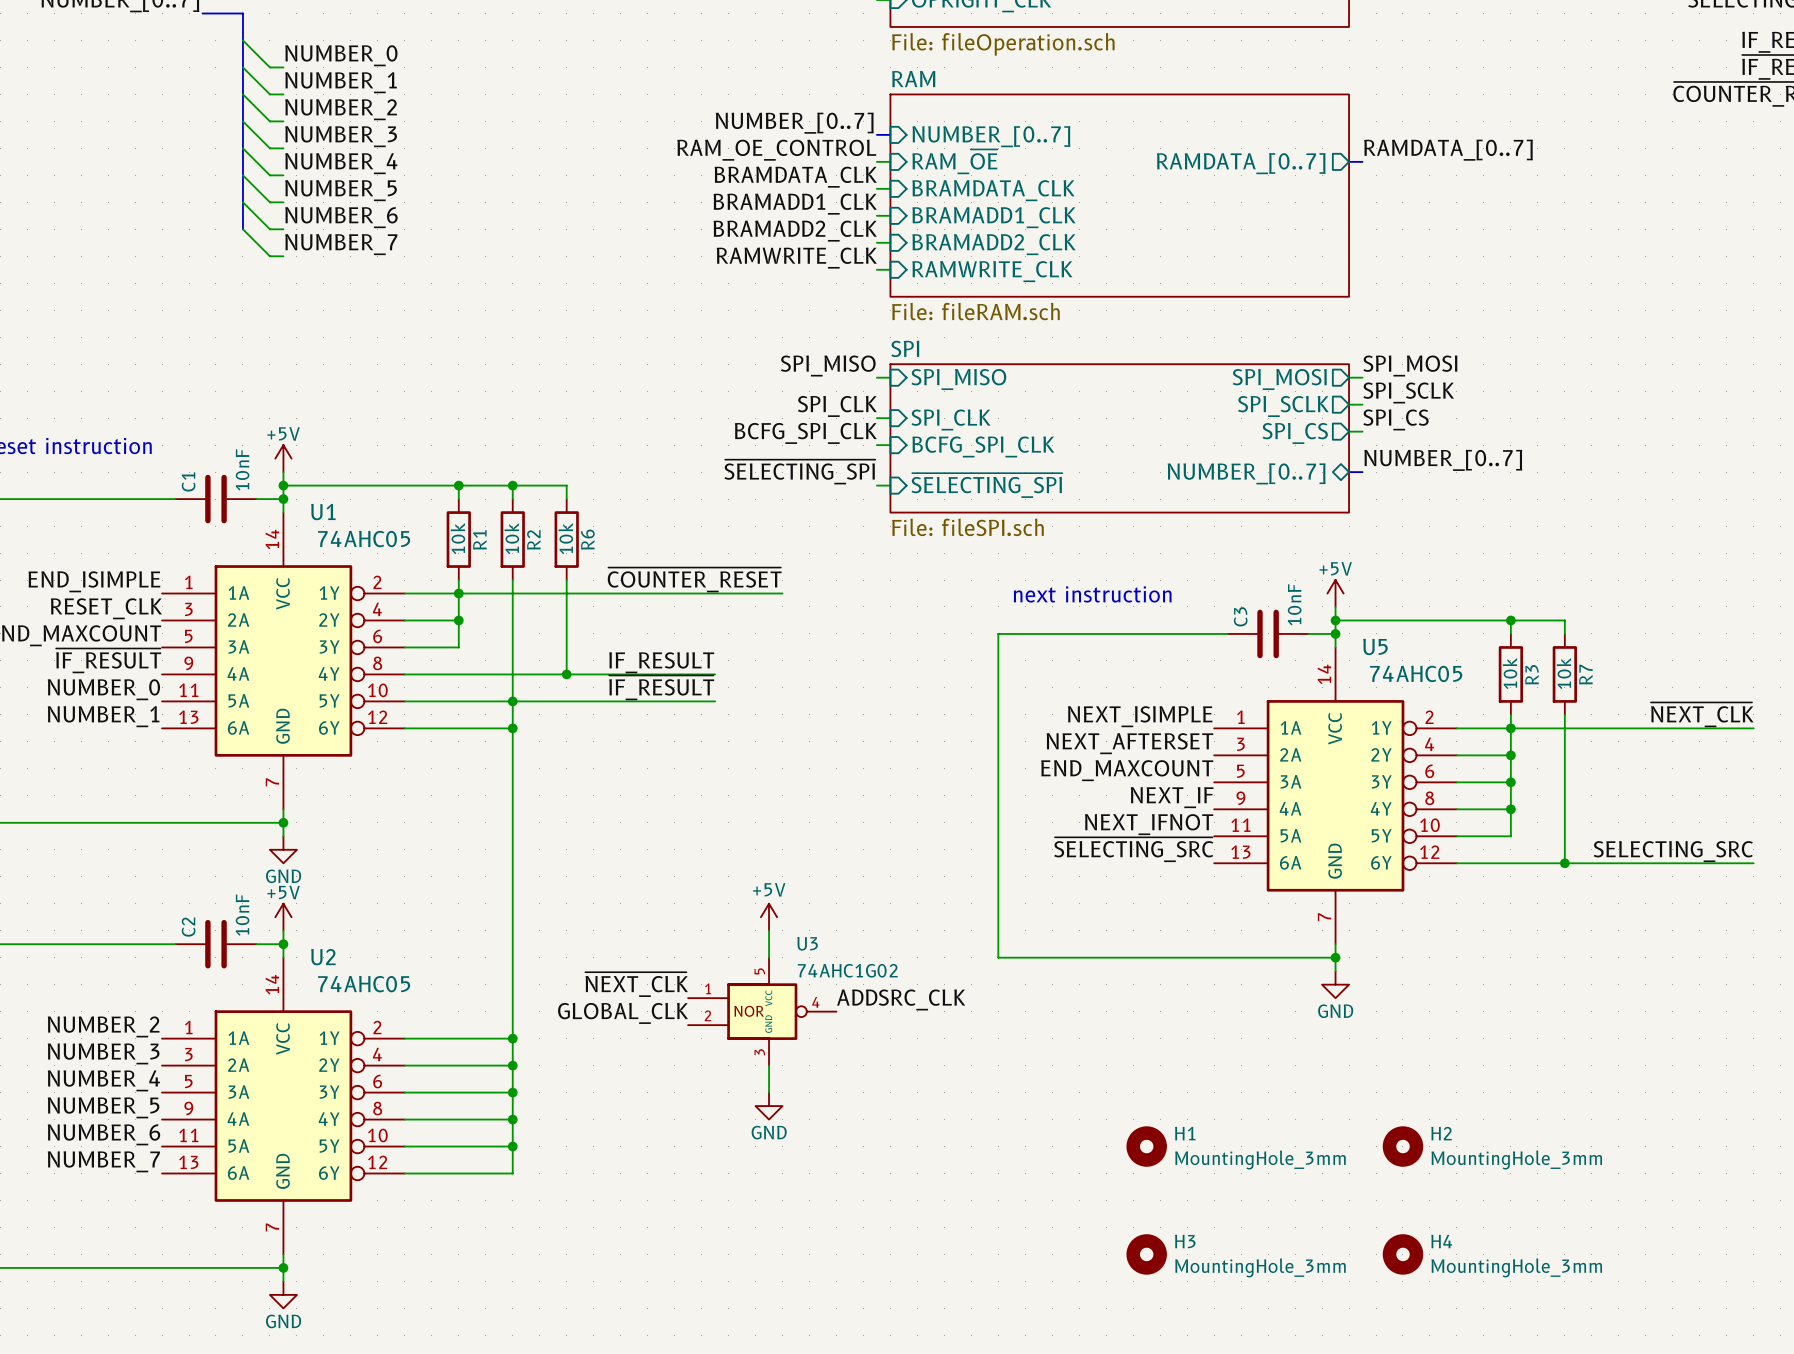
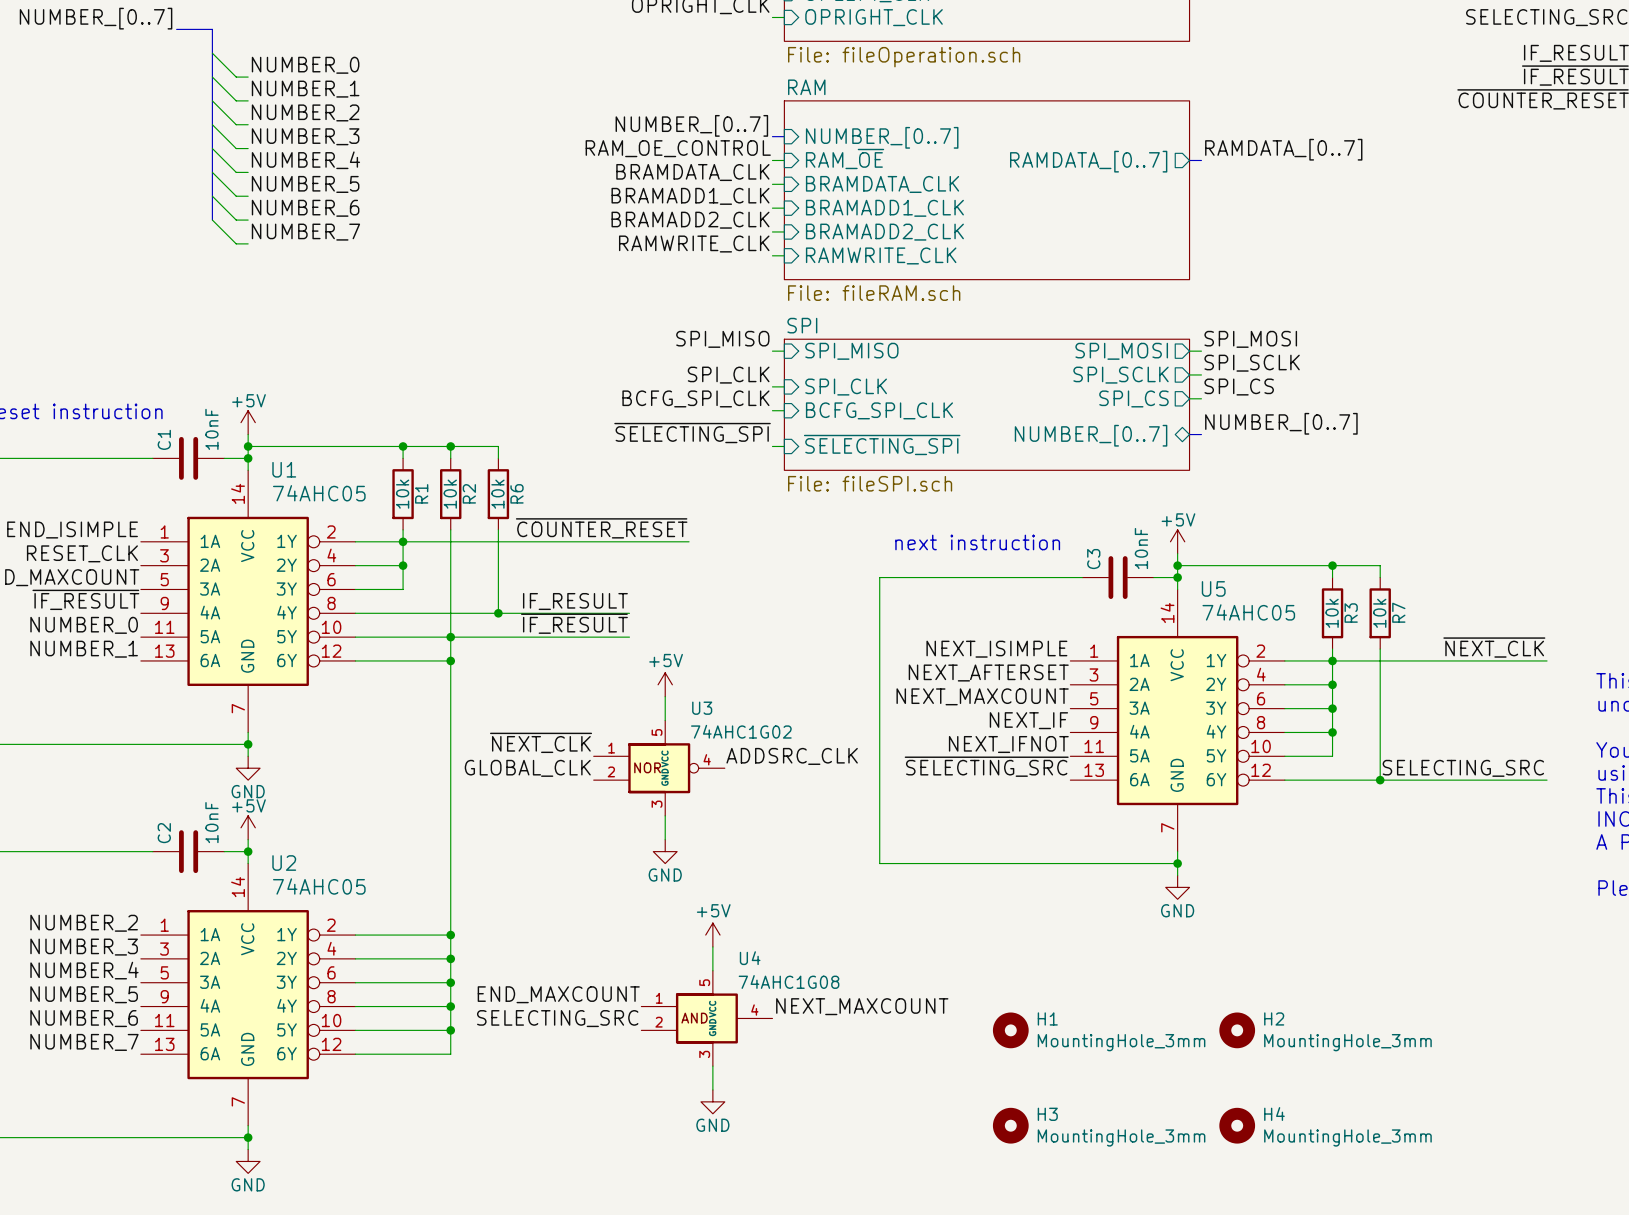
power symbol: none -> +5V (665, 684)
wire: none -> (665, 696) (665, 720)
label: END_MAXCOUNT (1127, 770) -> NEXT_MAXCOUNT (982, 696)
wire: none -> (665, 815) (665, 839)
power symbol: +5V (769, 917) -> none
wire: (769, 930) (769, 957) -> (712, 946) (712, 970)
power symbol: none -> GND (665, 851)
label position: ~{NEXT_CLK} (636, 984) -> ~{NEXT_CLK} (541, 742)
label position: ADDSRC_CLK (901, 999) -> ADDSRC_CLK (792, 756)
U3 position: (762, 1011) -> (659, 768)
label position: GLOBAL_CLK (623, 1013) -> GLOBAL_CLK (527, 768)
power symbol: none -> +5V (712, 935)
wire: (769, 1065) (769, 1092) -> (712, 1066) (712, 1089)
power symbol: GND (769, 1106) -> none
label: none -> END_MAXCOUNT (558, 994)
label: none -> NEXT_MAXCOUNT (862, 1006)
U4: none -> 74AHC1G08 (706, 1018)
label: none -> SELECTING_SRC (557, 1018)
power symbol: none -> GND (712, 1101)

